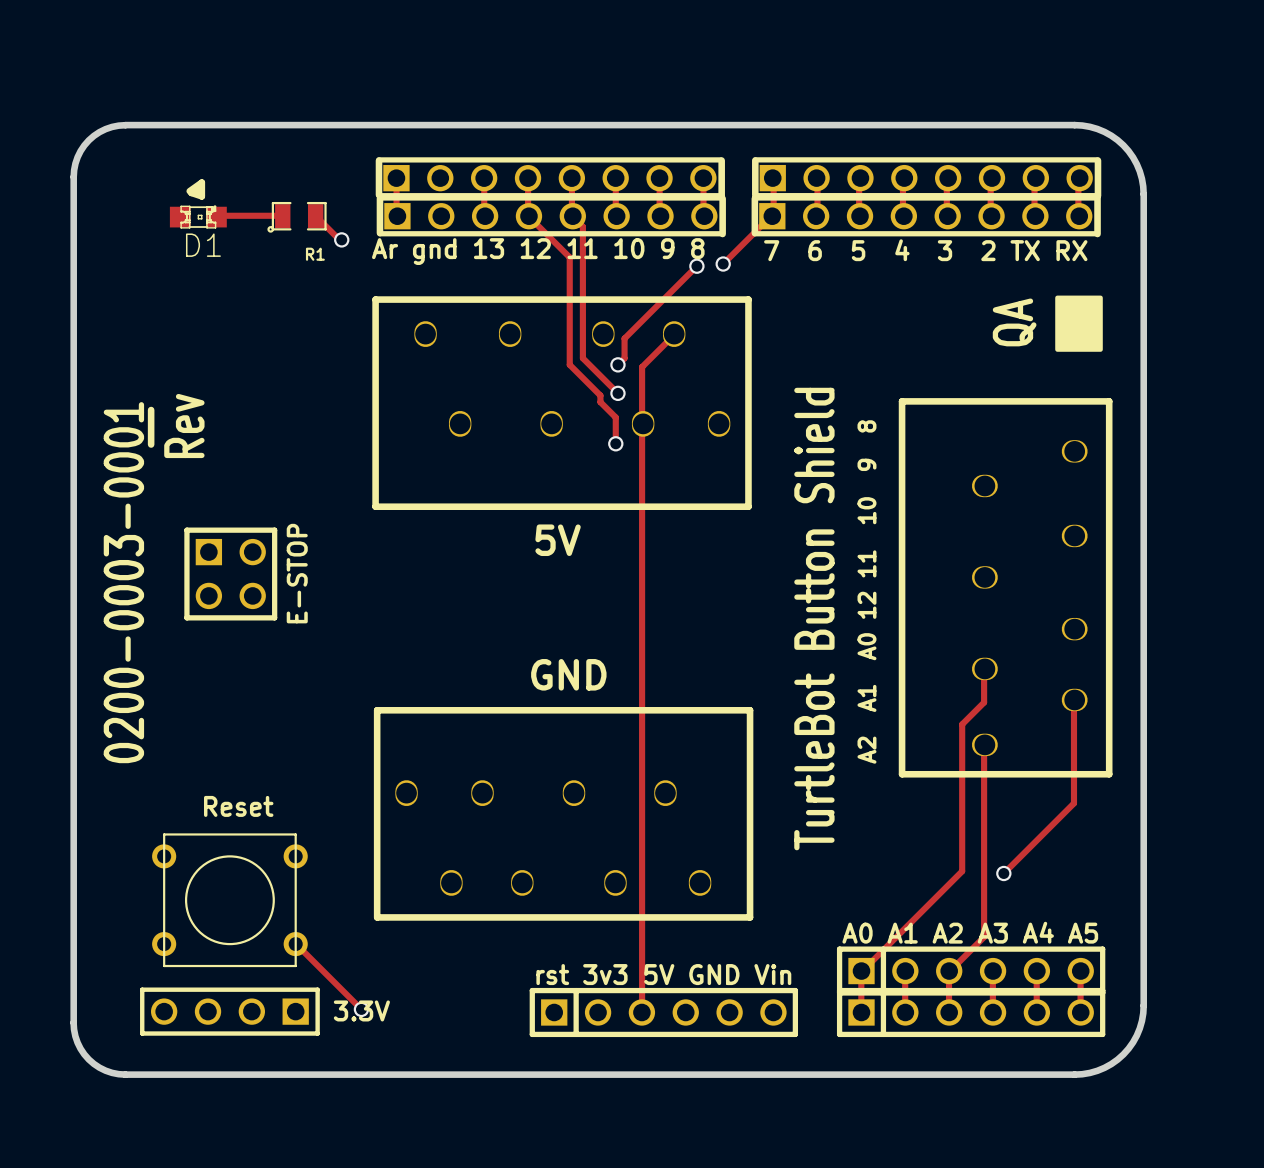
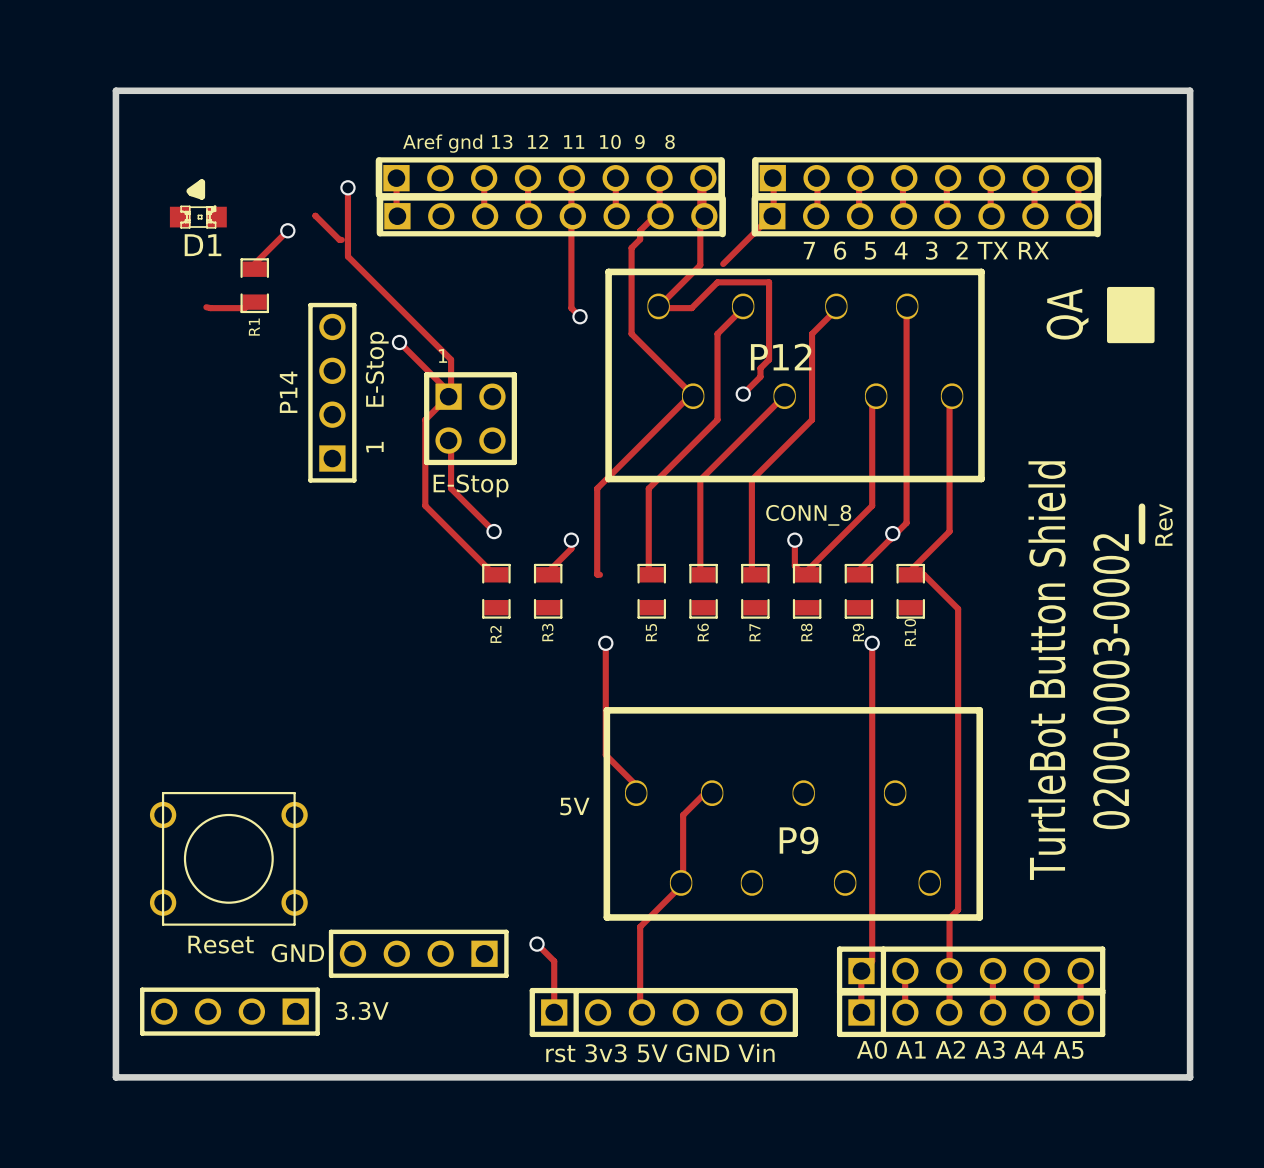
board edge: (1074, 125) (1097, 128) (1111, 135) (1123, 145) (1136, 164) (1143, 186) (1143, 1005) (1141, 1020) (1136, 1035) (1123, 1054) (1111, 1064) (1097, 1070) (1074, 1074) -> none
board edge: (1074, 125) (125, 125) (105, 129) (88, 140) (77, 157) (73, 176) (73, 1022) (77, 1042) (88, 1059) (105, 1070) (125, 1074) (1074, 1074) -> none
track: (571, 178) (571, 215) (582, 226) (582, 358) (617, 393) -> (571, 178) (571, 308) (580, 316)
track: none -> (703, 178) (700, 179) (700, 265) (657, 308) (691, 308) (717, 282) (769, 282) (769, 359) (760, 368) (760, 376) (743, 394)
track: none -> (347, 187) (347, 256) (451, 359) (451, 394)
via: none -> (347, 187)
R1 footprint: [267, 201, 327, 233] -> [240, 258, 269, 314]
track: none -> (657, 213) (640, 230) (640, 239) (631, 247) (631, 333) (691, 394)
track: (528, 215) (569, 257) (569, 364) (600, 395) (600, 402) (615, 417) (615, 443) -> none
track: (282, 216) (216, 217) -> none
track: none -> (287, 230) (253, 265) (254, 269)
via: none -> (287, 230)
via: (341, 239) -> none
part value: Ar gnd 13 12 11 10 9 8 (538, 251) -> Aref gnd 13 12 11 10 9 8 (538, 143)
via: (723, 264) -> none
track: (696, 266) (624, 338) (624, 358) (617, 364) -> none
via: (696, 266) -> none
track: none -> (254, 302) (253, 299) (244, 308) (206, 307)
track: none -> (743, 306) (717, 333) (717, 419) (648, 488) (648, 574) (651, 574)
track: none -> (836, 306) (837, 308) (812, 333) (812, 419) (751, 480) (751, 574) (755, 574)
track: none -> (907, 306) (906, 522) (855, 574) (858, 574)
via: none -> (580, 316)
text position: QA (1014, 322) -> QA (1067, 314)
drawing position: (1079, 323) -> (1130, 315)
track: (674, 334) (642, 367) (641, 1012) -> (683, 883) (640, 926) (640, 1012) (641, 1012)
track: none -> (399, 342) (451, 394)
via: none -> (399, 342)
via: (617, 364) -> none
P12: none -> CONN_8 (795, 375)
P14: none -> 1 E-Stop (332, 392)
via: (617, 393) -> none
track: none -> (451, 394) (425, 419) (425, 505) (496, 574)
track: none -> (691, 394) (597, 488) (597, 574) (599, 574)
via: none -> (743, 394)
track: none -> (784, 396) (786, 394) (700, 480) (700, 574) (703, 574)
track: none -> (876, 396) (872, 394) (872, 505) (803, 574)
track: none -> (952, 396) (949, 394) (949, 531) (906, 574)
part: 5V (562, 403) -> none
line: (151, 410) (151, 444) -> none
part: none -> E-Stop (470, 418)
text: Rev (184, 426) -> none
track: none -> (448, 440) (451, 437) (451, 488) (494, 531)
via: (615, 443) -> none
line: none -> (1142, 506) (1142, 541)
text: none -> Rev (1164, 524)
via: none -> (494, 531)
via: none -> (892, 533)
track: none -> (571, 540) (571, 548) (545, 574) (548, 574)
via: none -> (571, 540)
track: none -> (794, 540) (794, 565) (803, 574)
via: none -> (794, 540)
part: E-STOP (230, 574) -> none
text: 0200-0003-0001 (123, 582) -> none
part: A2 A1 A0 12 11 10 9 8 (1005, 587) -> none
R2: none -> (496, 591)
R3: none -> (548, 591)
R5: none -> (651, 591)
R6: none -> (703, 591)
R7: none -> (755, 591)
R8: none -> (807, 591)
R9: none -> (858, 591)
R10: none -> (910, 591)
text position: TurtleBot Button Shield (814, 619) -> TurtleBot Button Shield (1047, 670)
track: none -> (605, 643) (605, 755) (640, 789) (636, 793)
via: none -> (605, 643)
via: none -> (872, 643)
track: (984, 668) (984, 702) (962, 724) (962, 871) (872, 961) -> (872, 643) (872, 961)
text: none -> 0200-0003-0002 (1111, 681)
track: (1074, 699) (1073, 803) (1003, 873) -> none
track: (984, 744) (984, 937) (949, 972) (949, 1012) -> (906, 574) (923, 574) (958, 608) (958, 909) (949, 918) (949, 1012)
track: none -> (712, 793) (708, 789) (683, 815) (683, 883)
part: GND (563, 813) -> none
P9: none -> 5V (793, 813)
part: none -> Reset (228, 858)
via: (1003, 873) -> none
part: Reset (229, 900) -> none
A0 A1 A2 A3 A4 A5 name position: A0 A1 A2 A3 A4 A5 (970, 932) -> A0 A1 A2 A3 A4 A5 (970, 1049)
track: (295, 944) (361, 1009) -> none
track: none -> (537, 944) (554, 961) (554, 1012)
via: none -> (537, 944)
part: none -> GND (418, 953)
rst 3v3 5V GND Vin name position: rst 3v3 5V GND Vin (663, 974) -> rst 3v3 5V GND Vin (660, 1053)
via: (361, 1009) -> none
board edge: none -> (1190, 1077) (1190, 90) (115, 90) (115, 1077) (1190, 1077)

